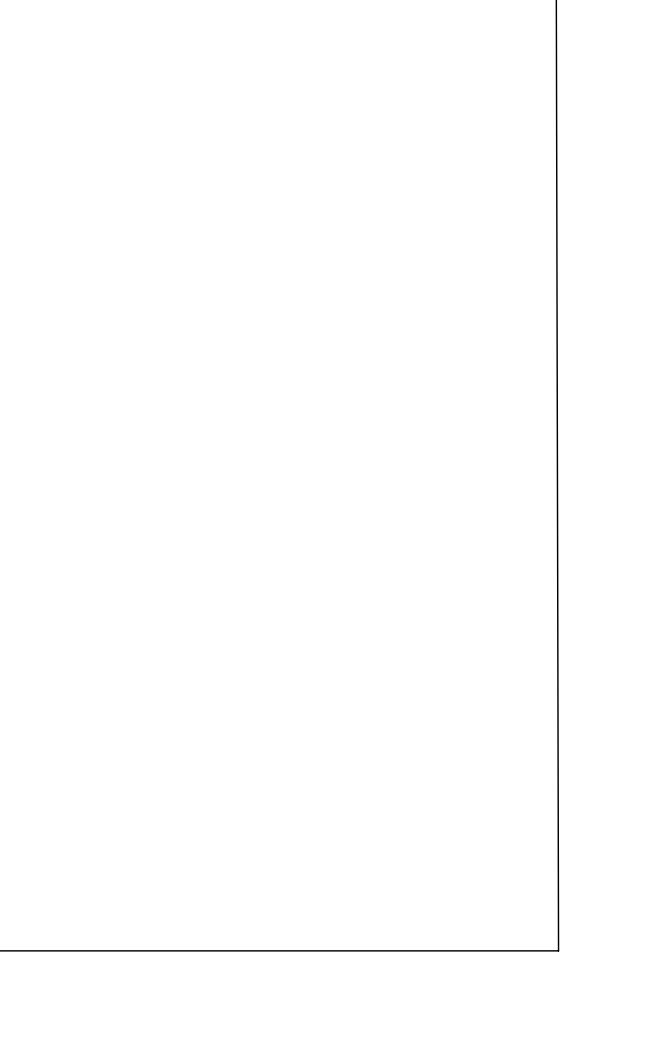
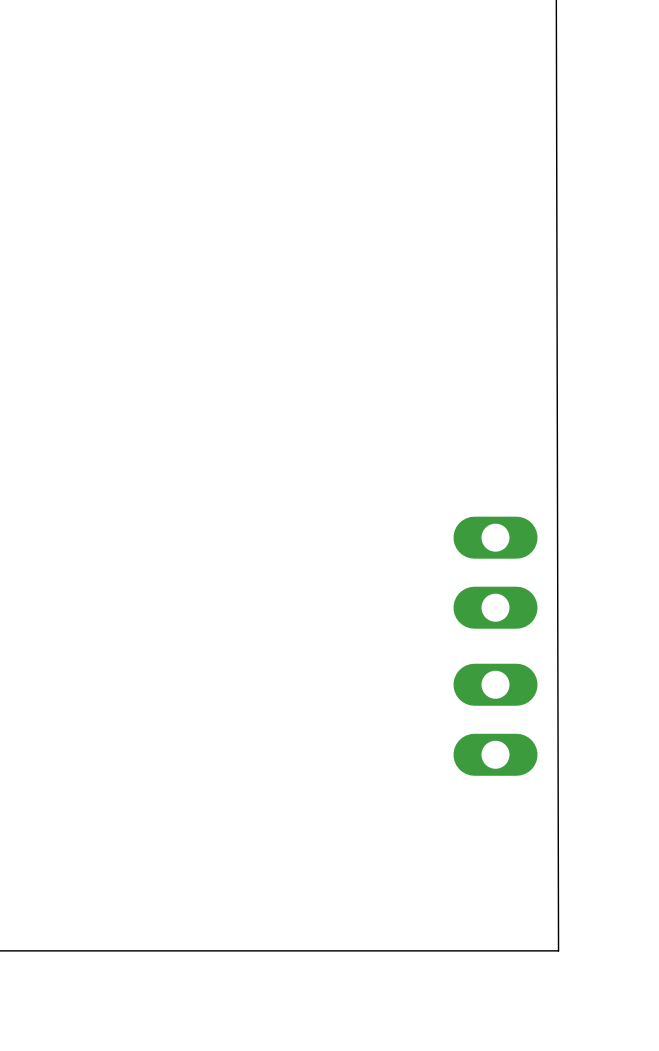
part: none -> (495, 572)
part: none -> (495, 719)

